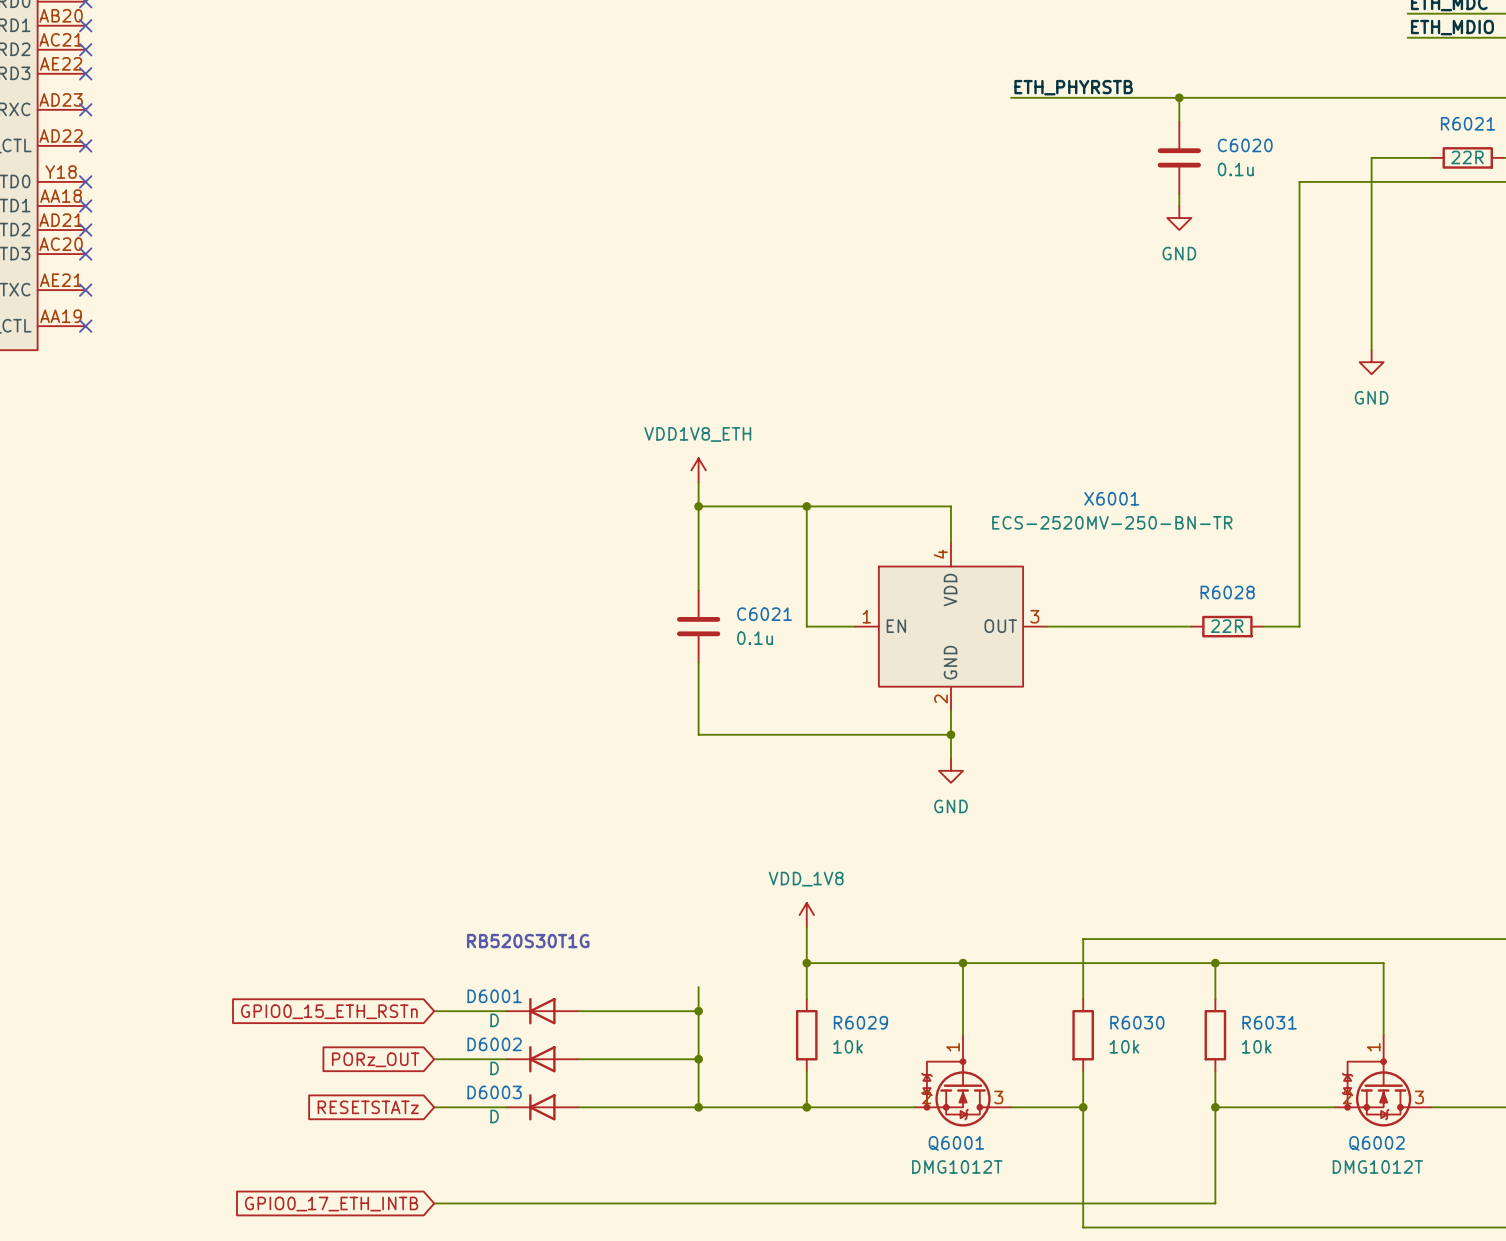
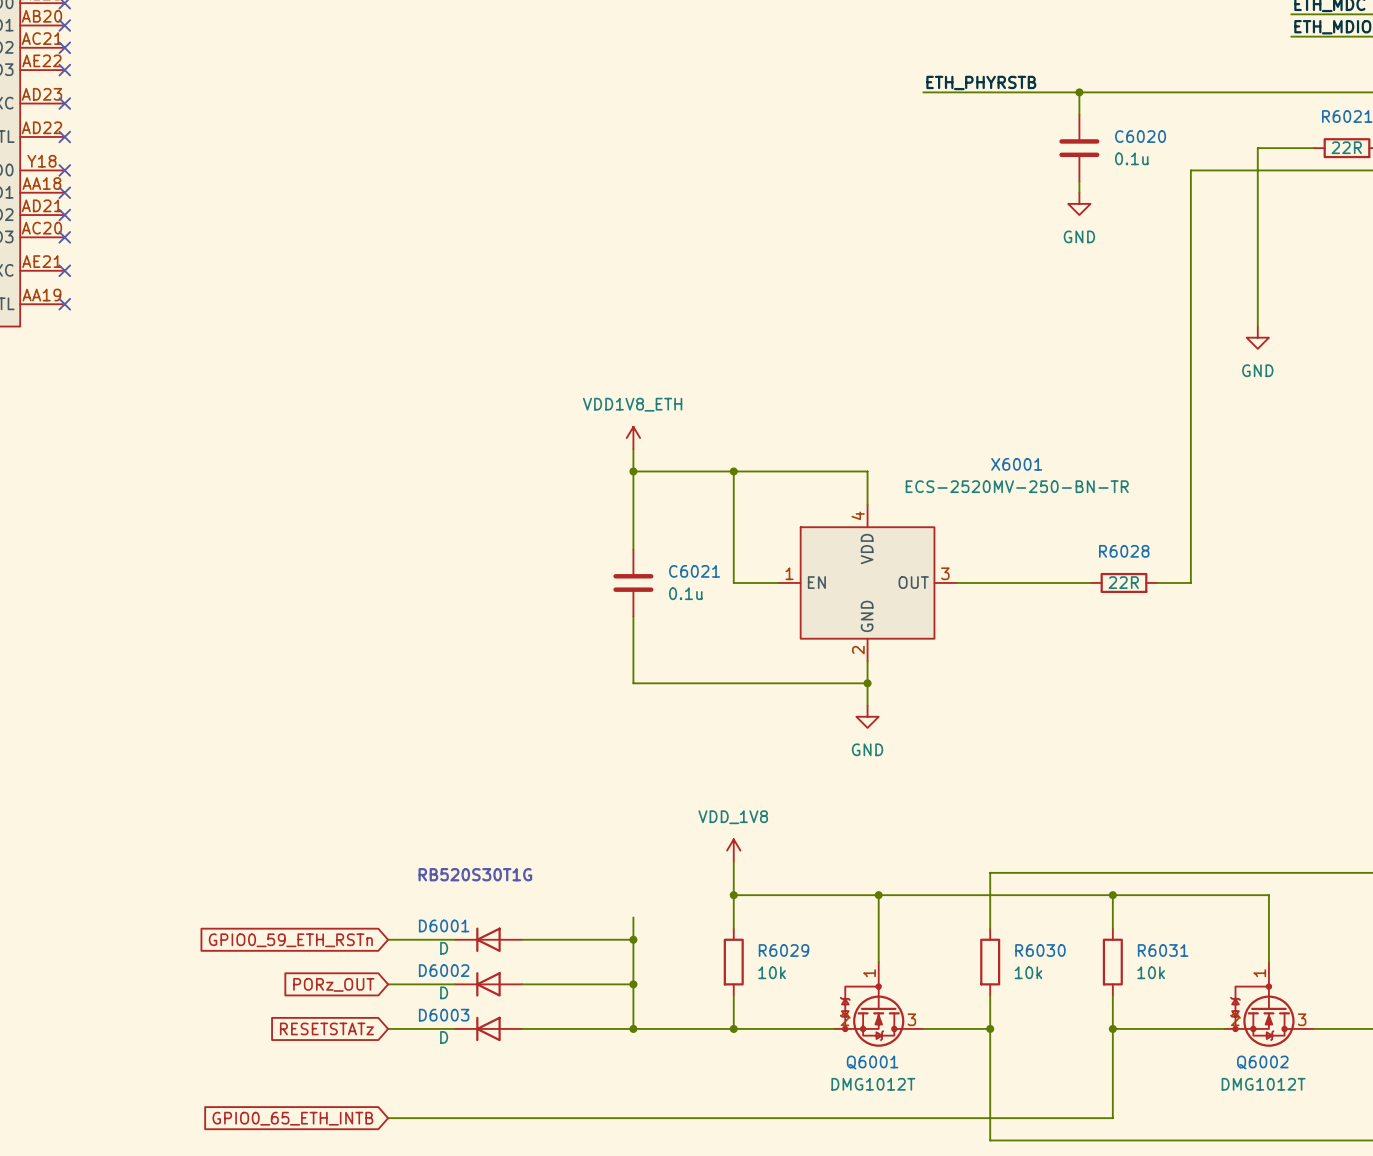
global label: GPIO0_15_ETH_RSTn (329, 1011) -> GPIO0_59_ETH_RSTn (290, 940)
global label: GPIO0_17_ETH_INTB (331, 1204) -> GPIO0_65_ETH_INTB (292, 1118)

